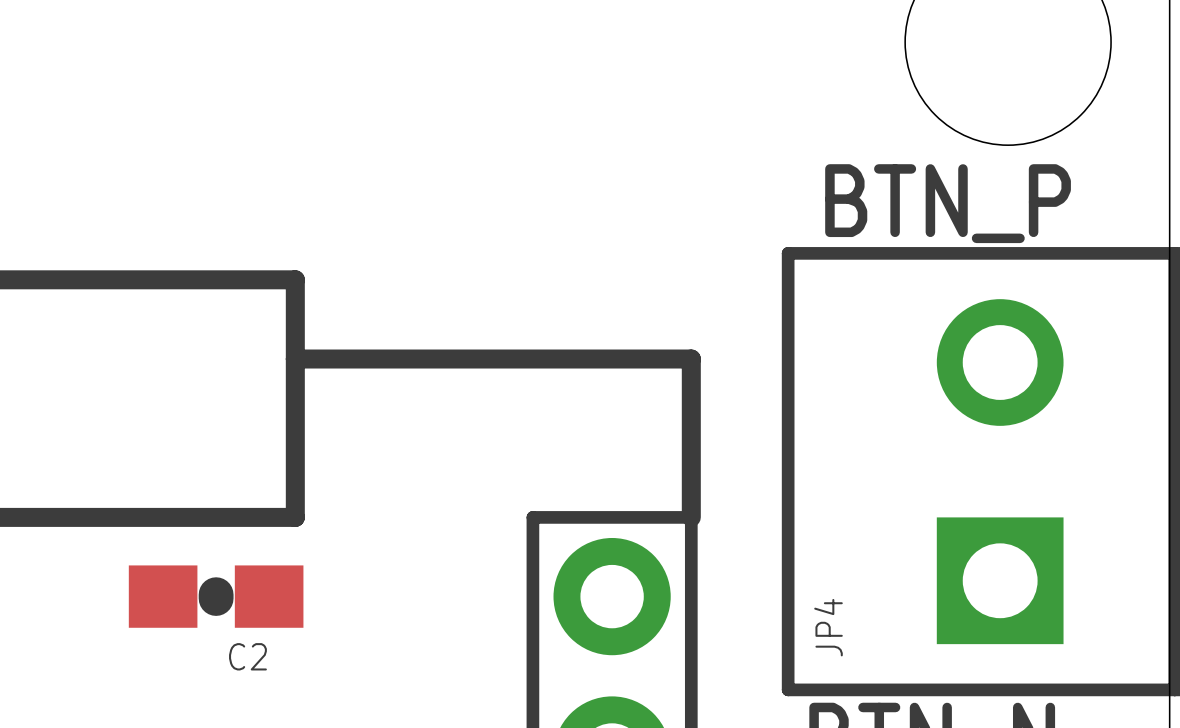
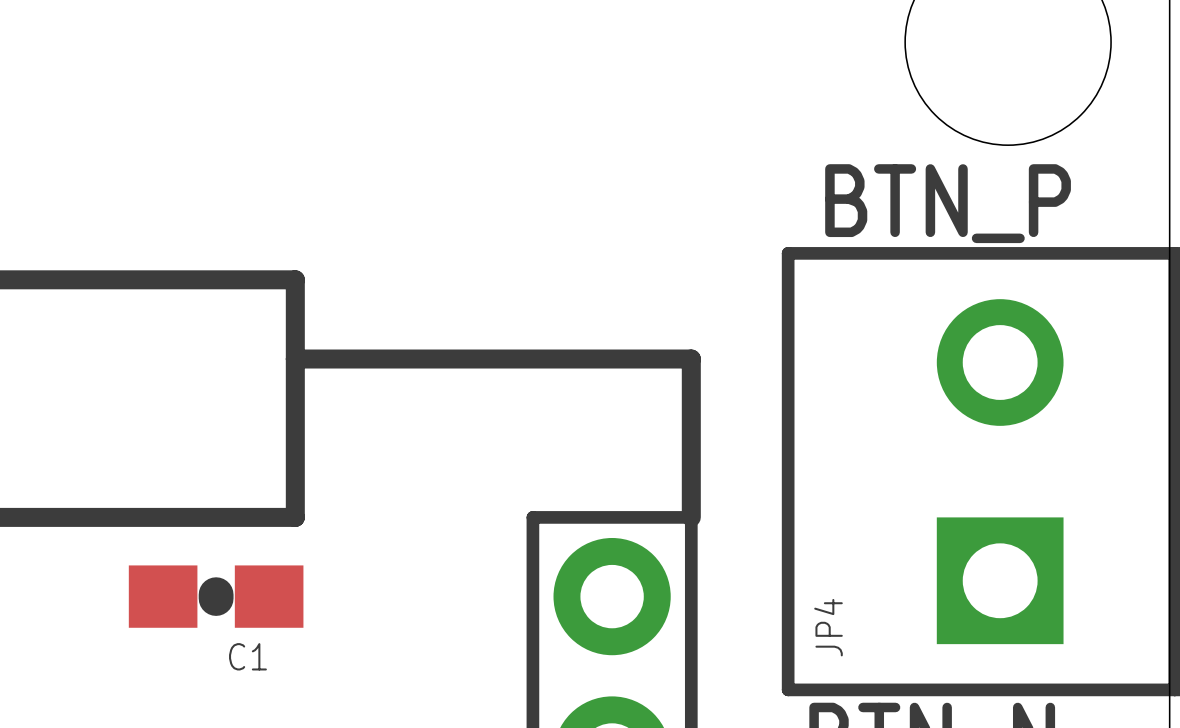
C2 name: C2 (247, 656) -> C1 (247, 656)

